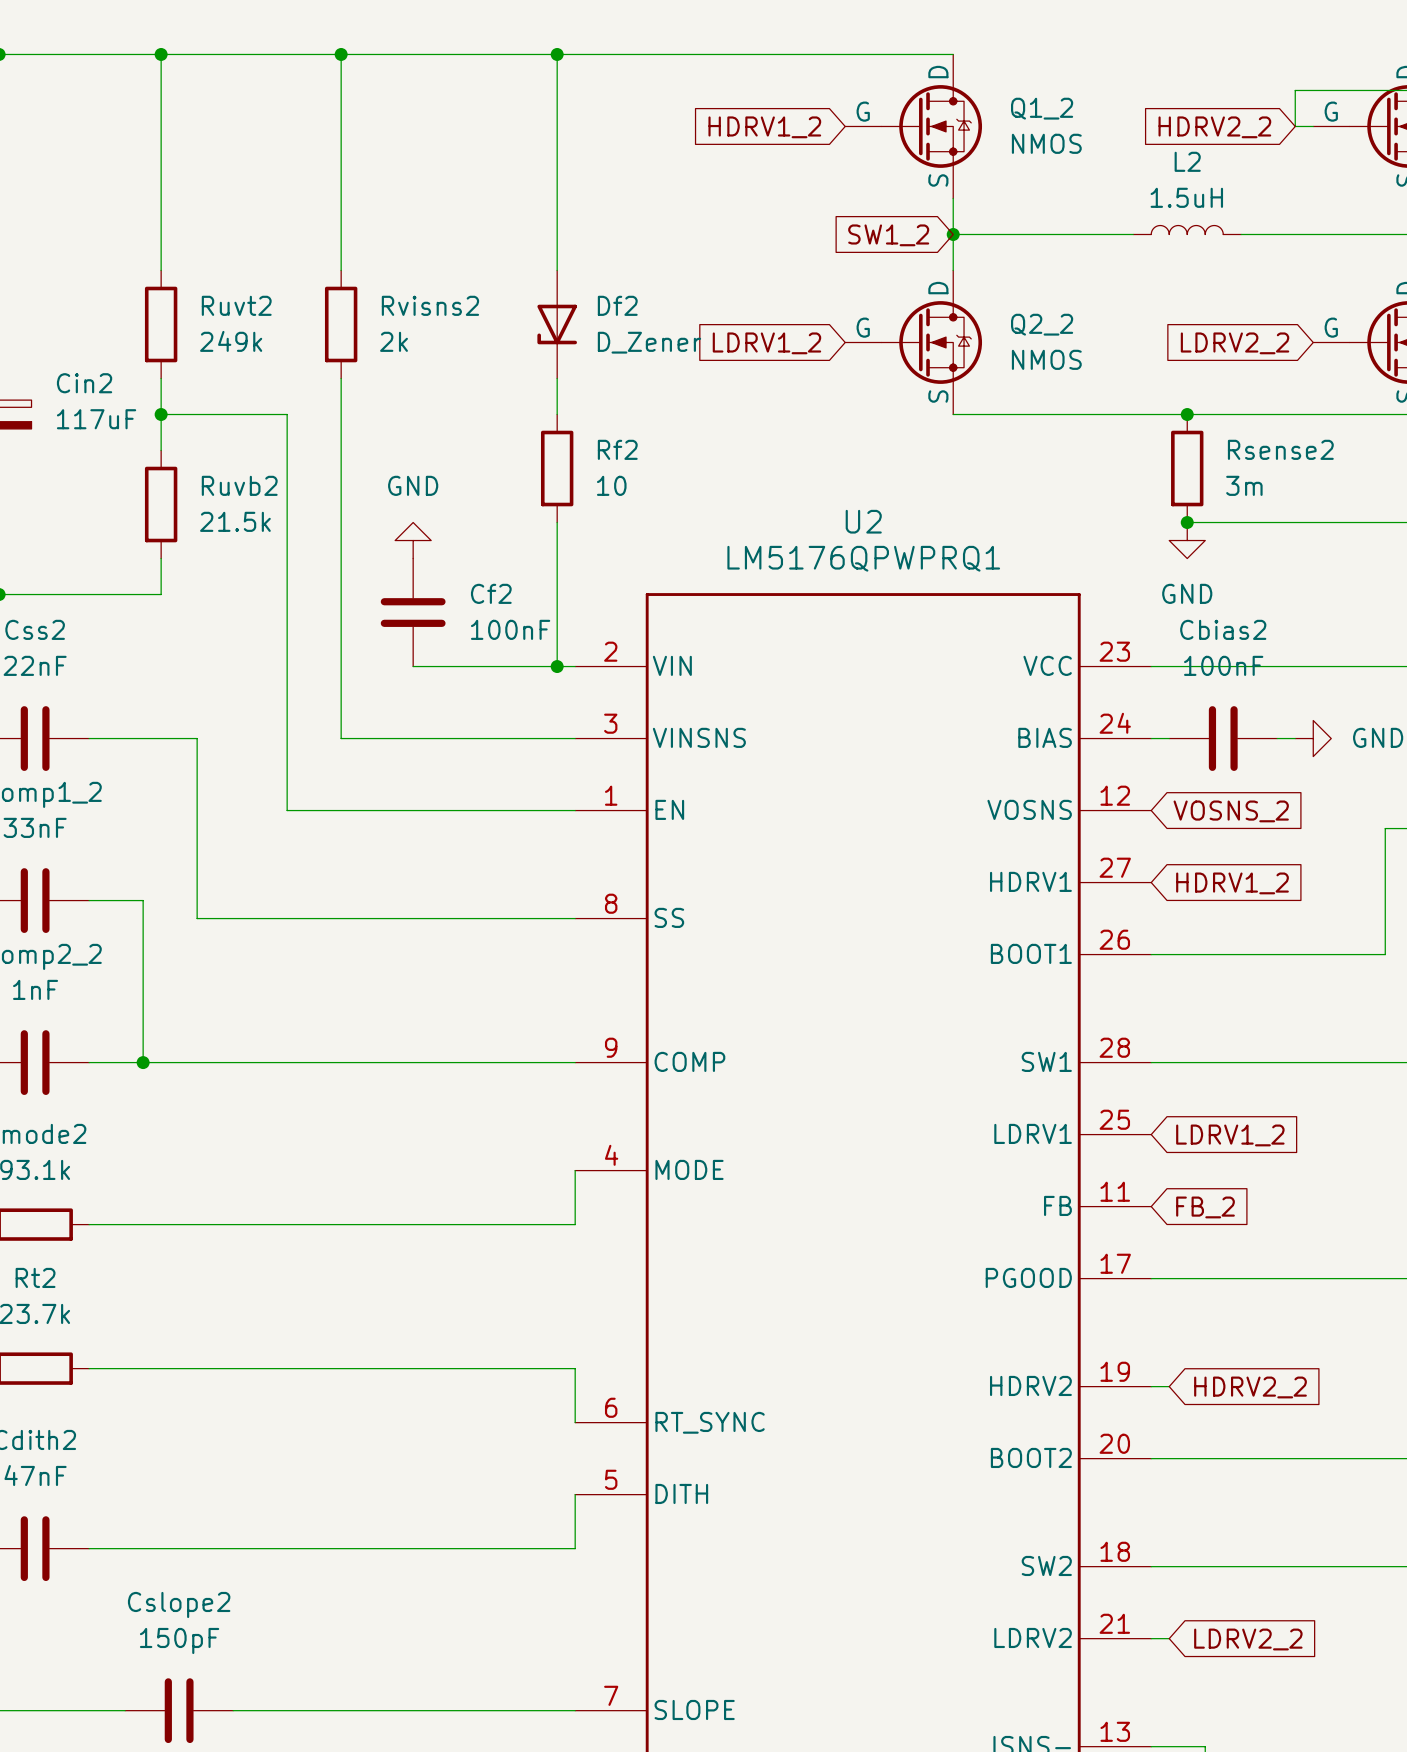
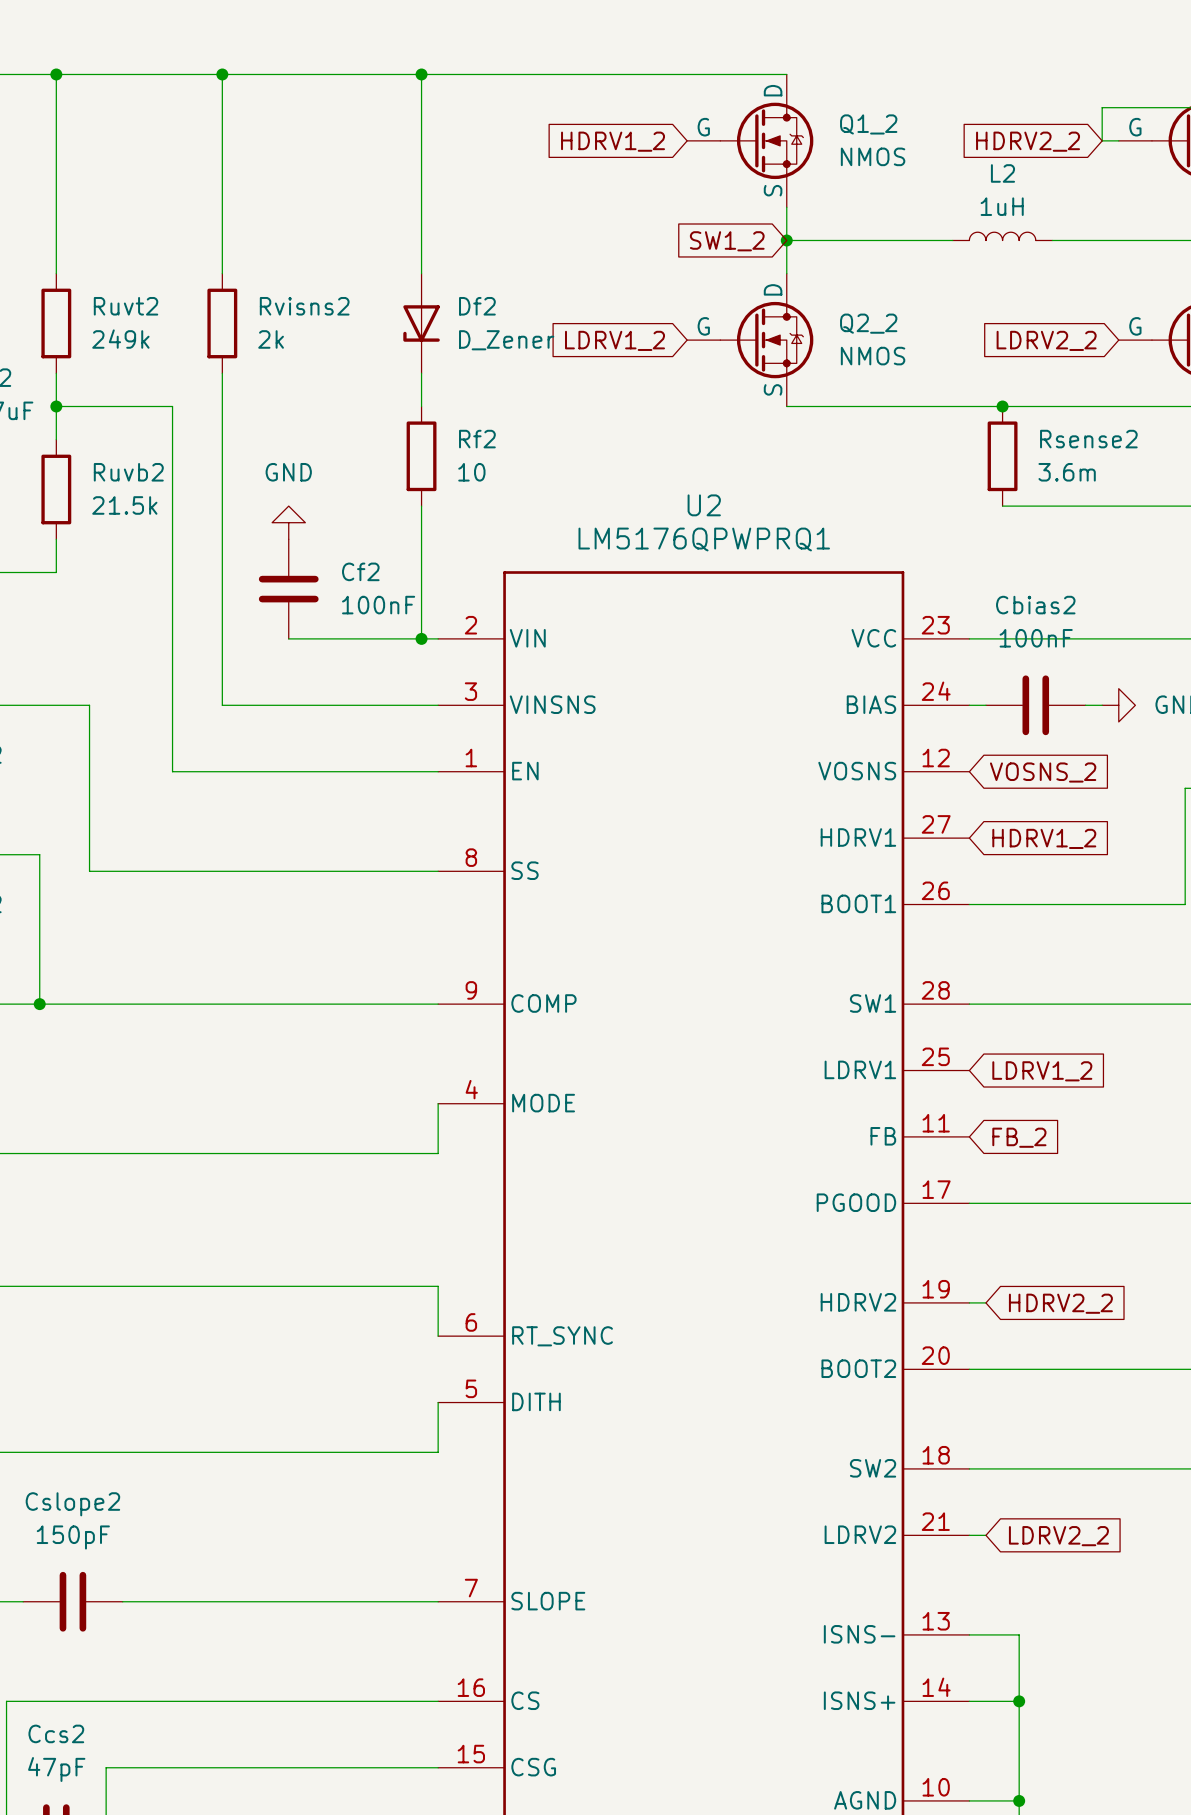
L2 value: 1.5uH (1186, 197) -> 1uH (1002, 206)
Rsense2 value: 3m (1244, 485) -> 3.6m (1067, 472)
junction: (1187, 522) -> none
power symbol: GND (1187, 540) -> none

